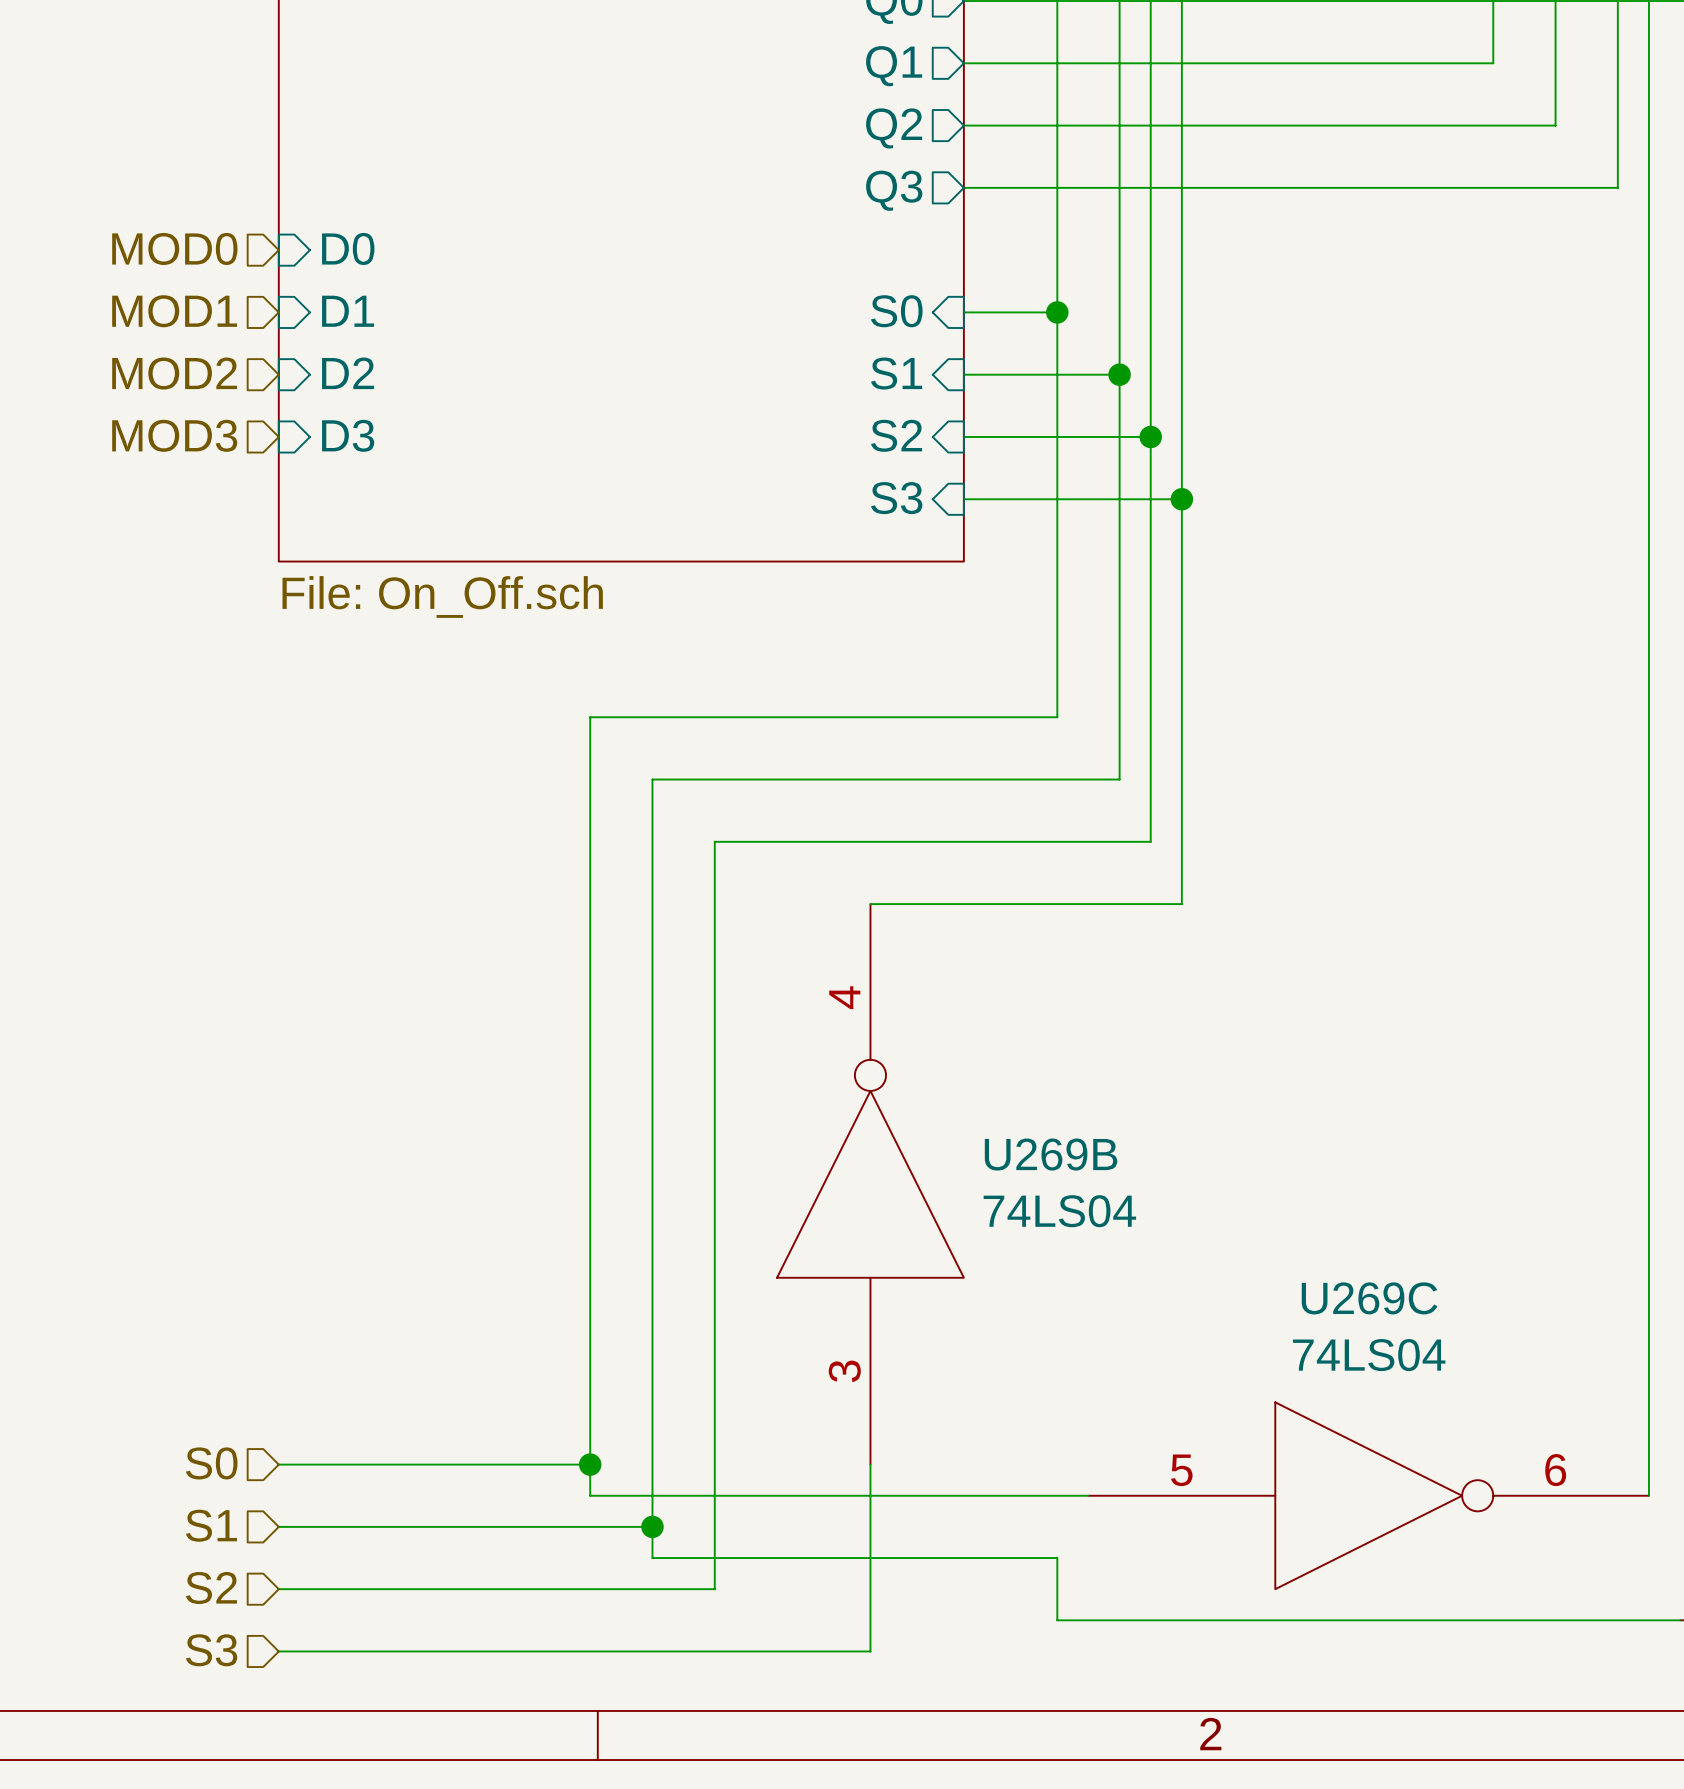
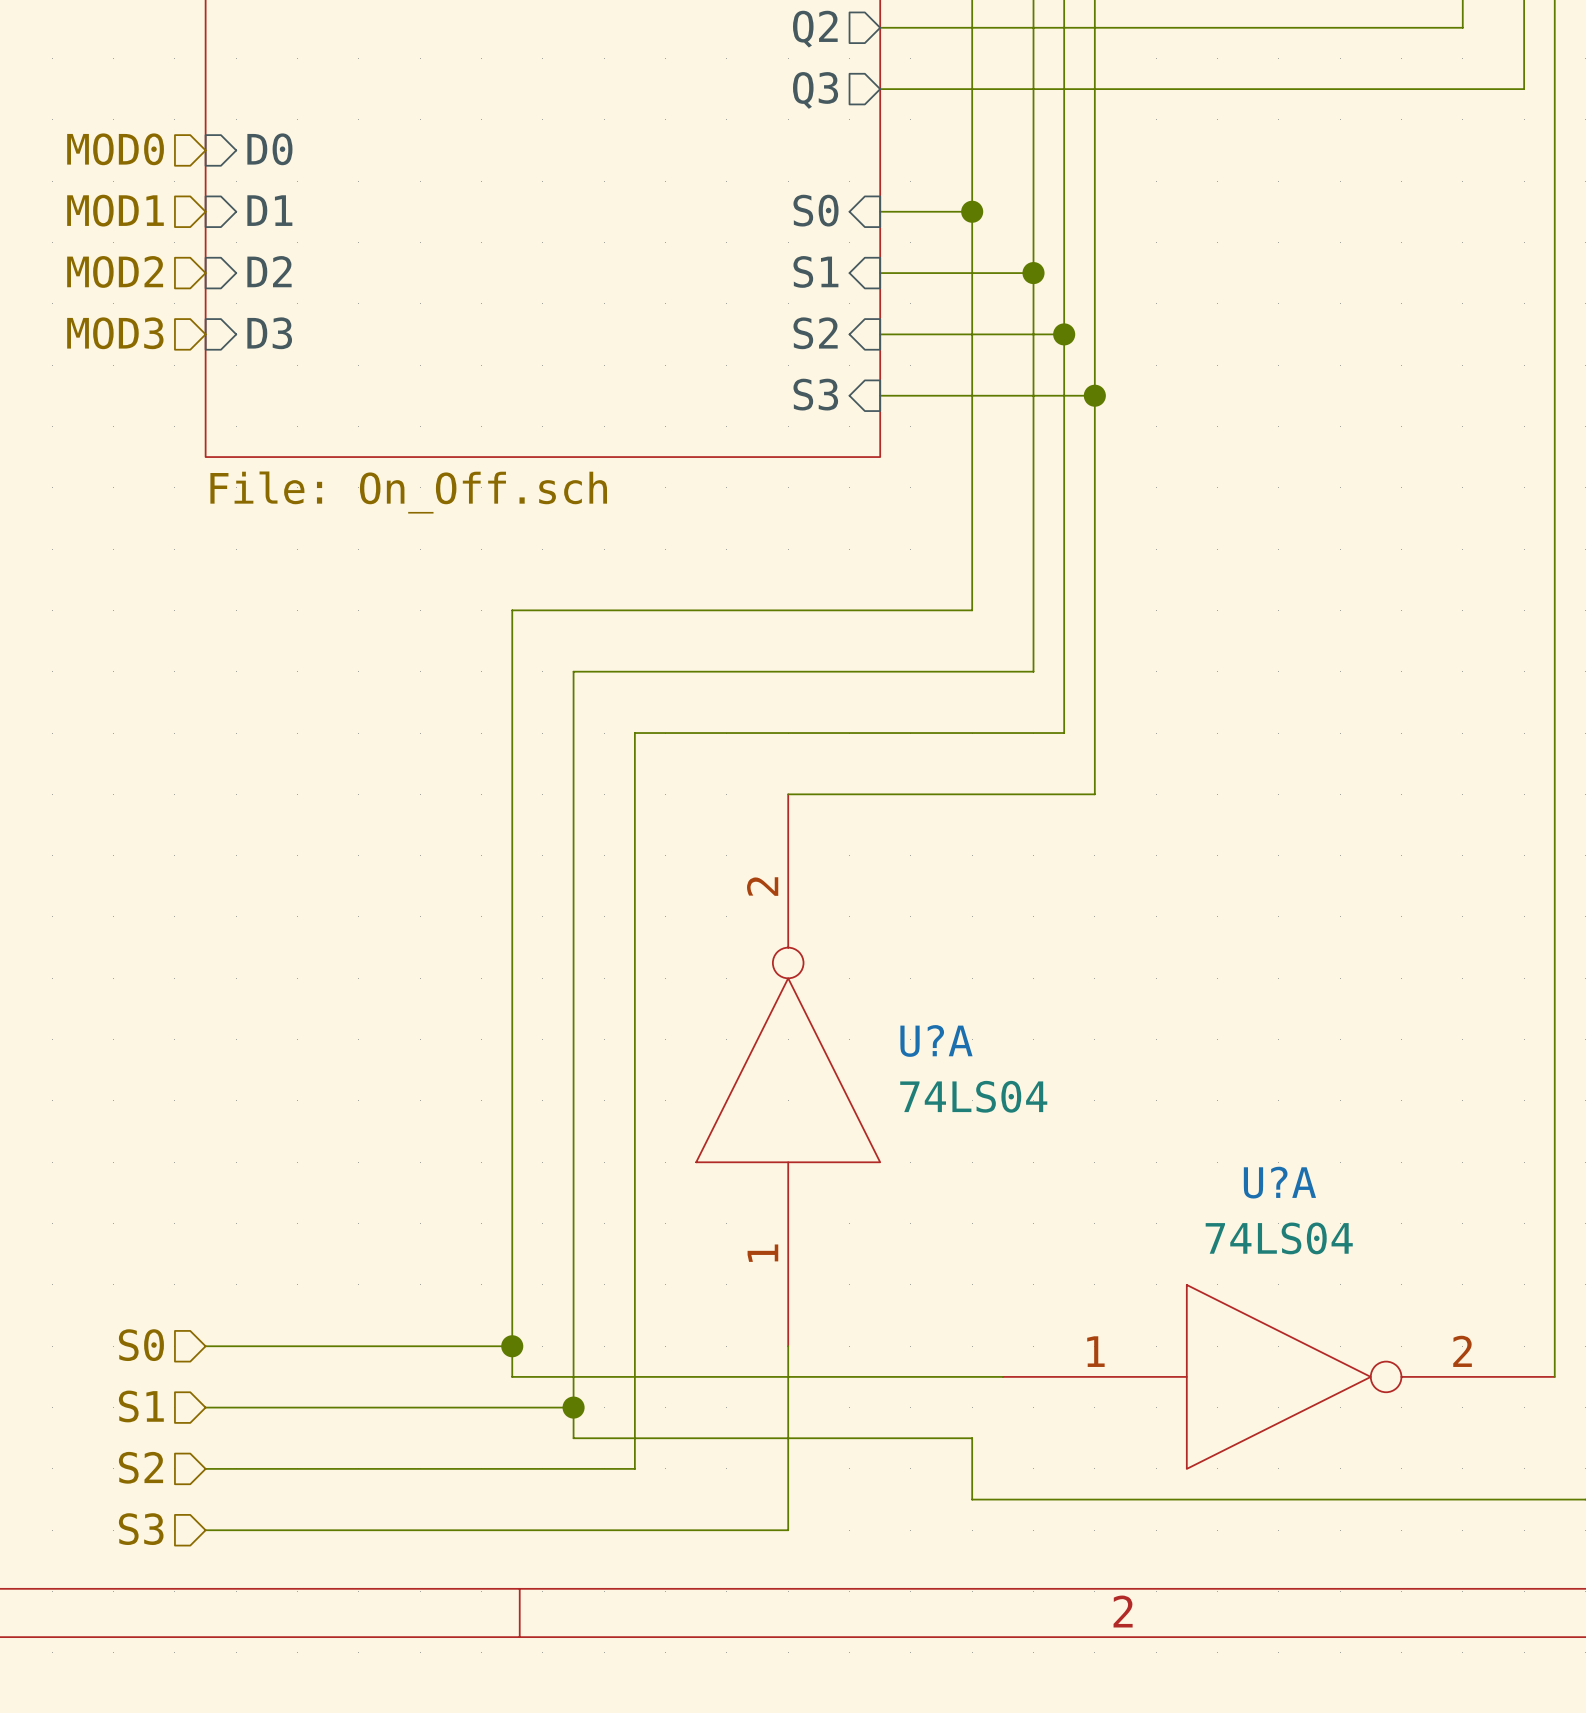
U269B pin number: 4 (844, 997) -> 2 (762, 886)
U269B name: U269B (1051, 1154) -> U?A (936, 1040)
U269C name: U269C (1369, 1298) -> U?A (1279, 1182)
U269B pin number: 3 (844, 1371) -> 1 (762, 1253)
U269C pin number: 5 (1181, 1470) -> 1 (1095, 1351)
U269C pin number: 6 (1555, 1470) -> 2 (1462, 1351)

